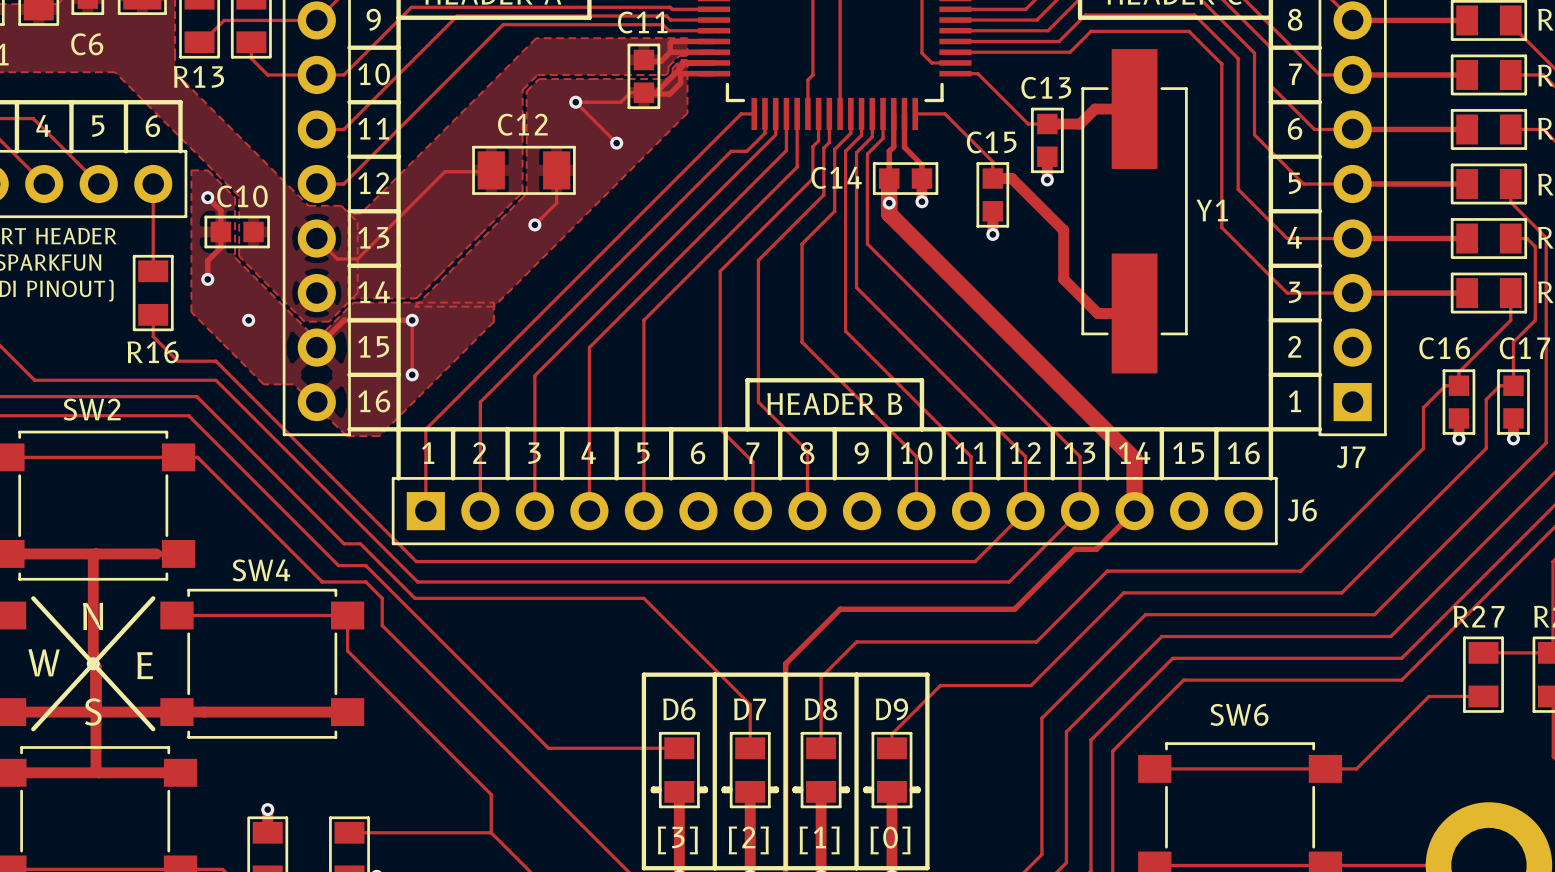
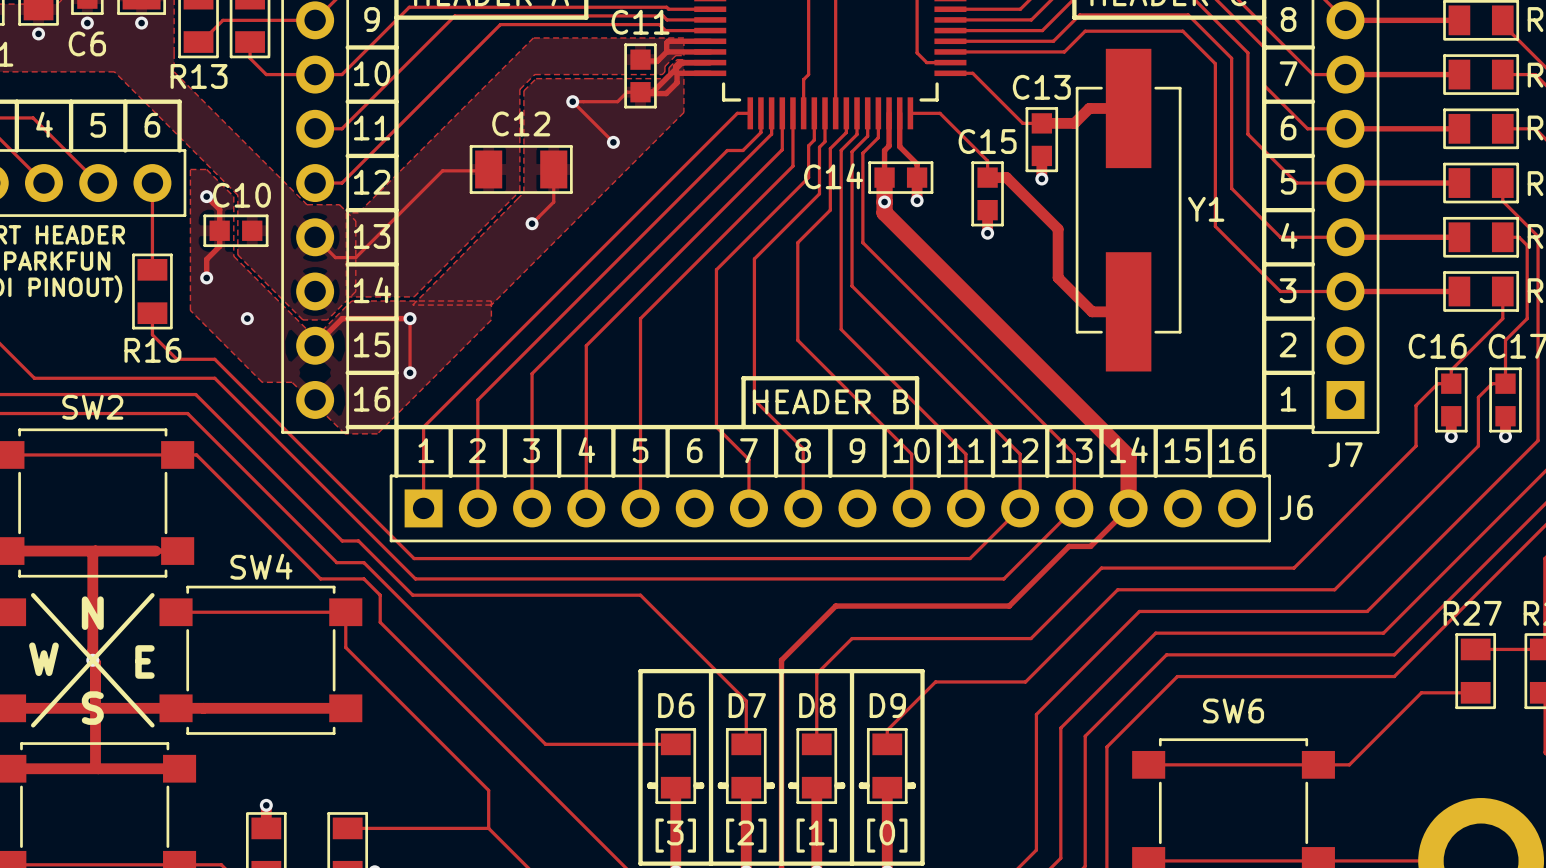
via: none -> (87, 23)
via: none -> (141, 23)
via: none -> (38, 33)

